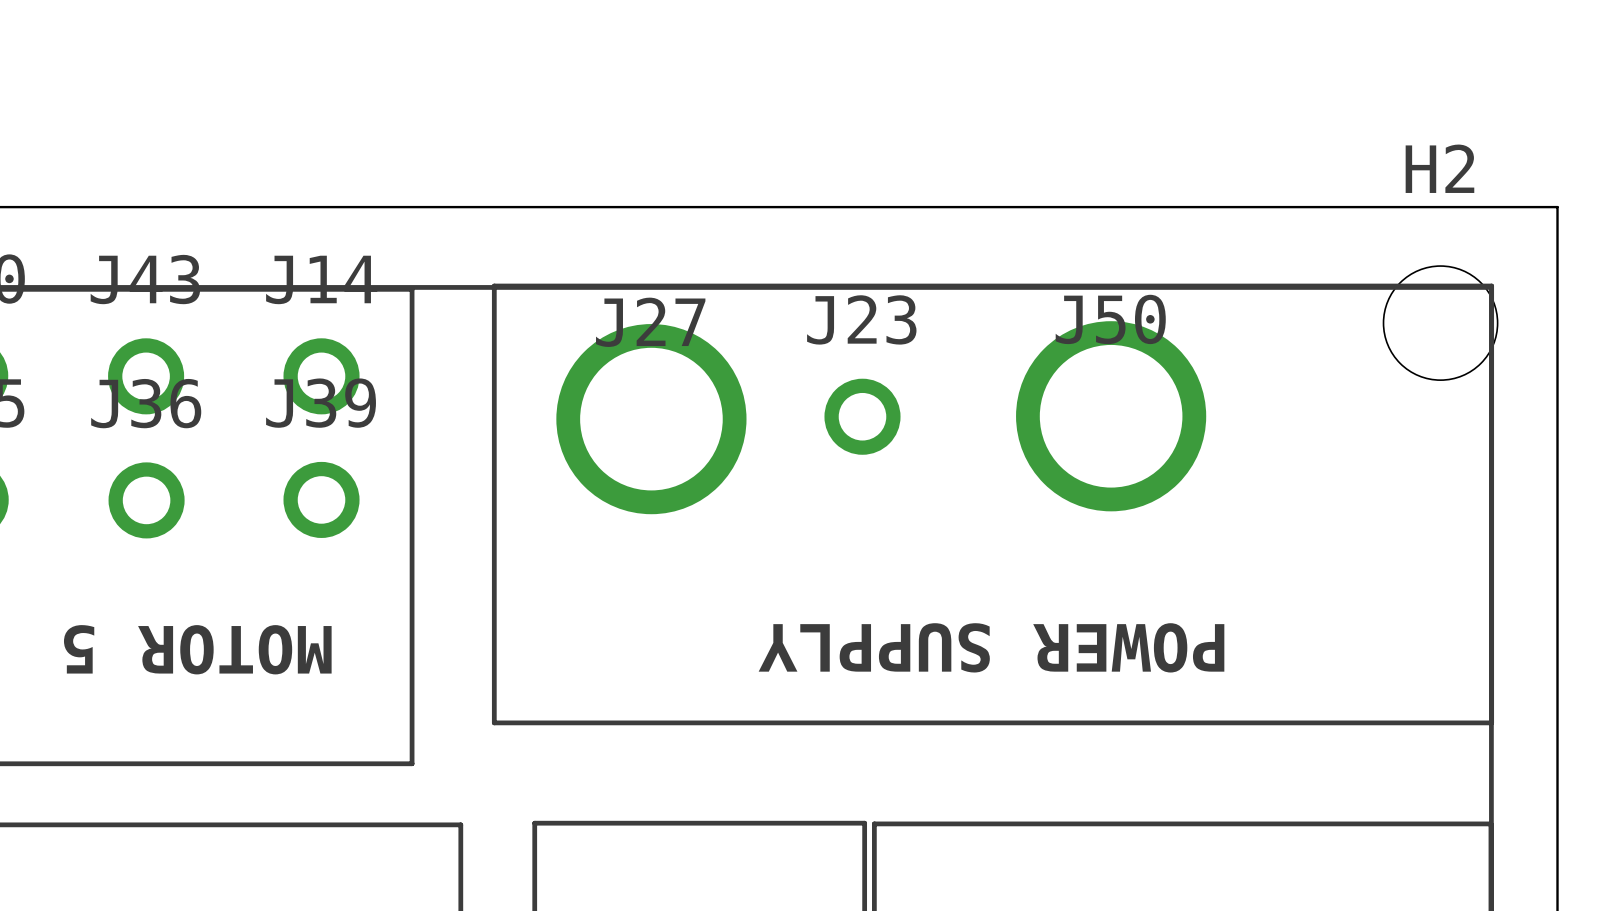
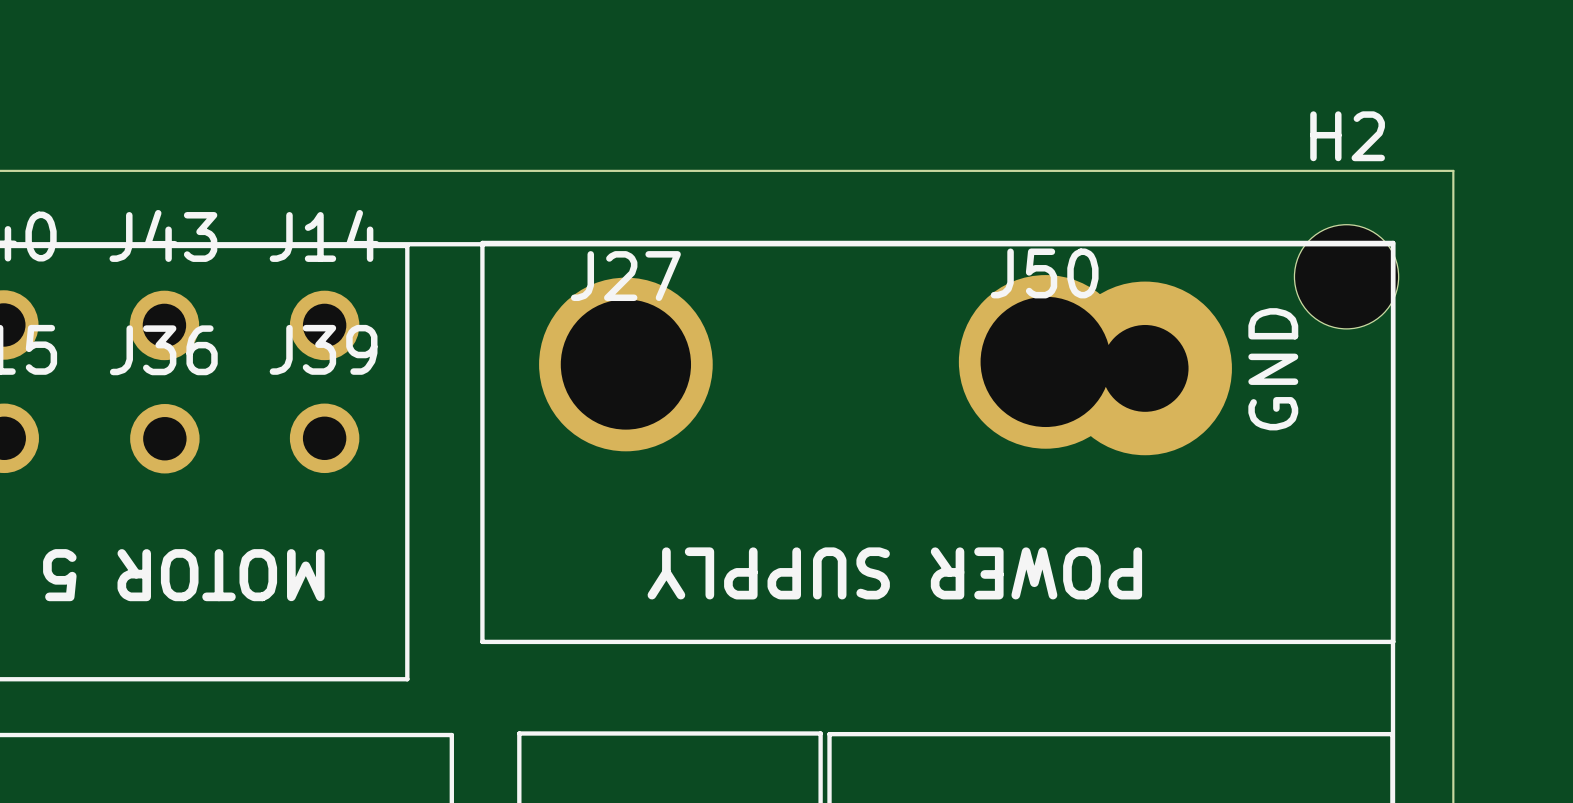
J23: (862, 416) -> none
GND: none -> (1145, 368)

